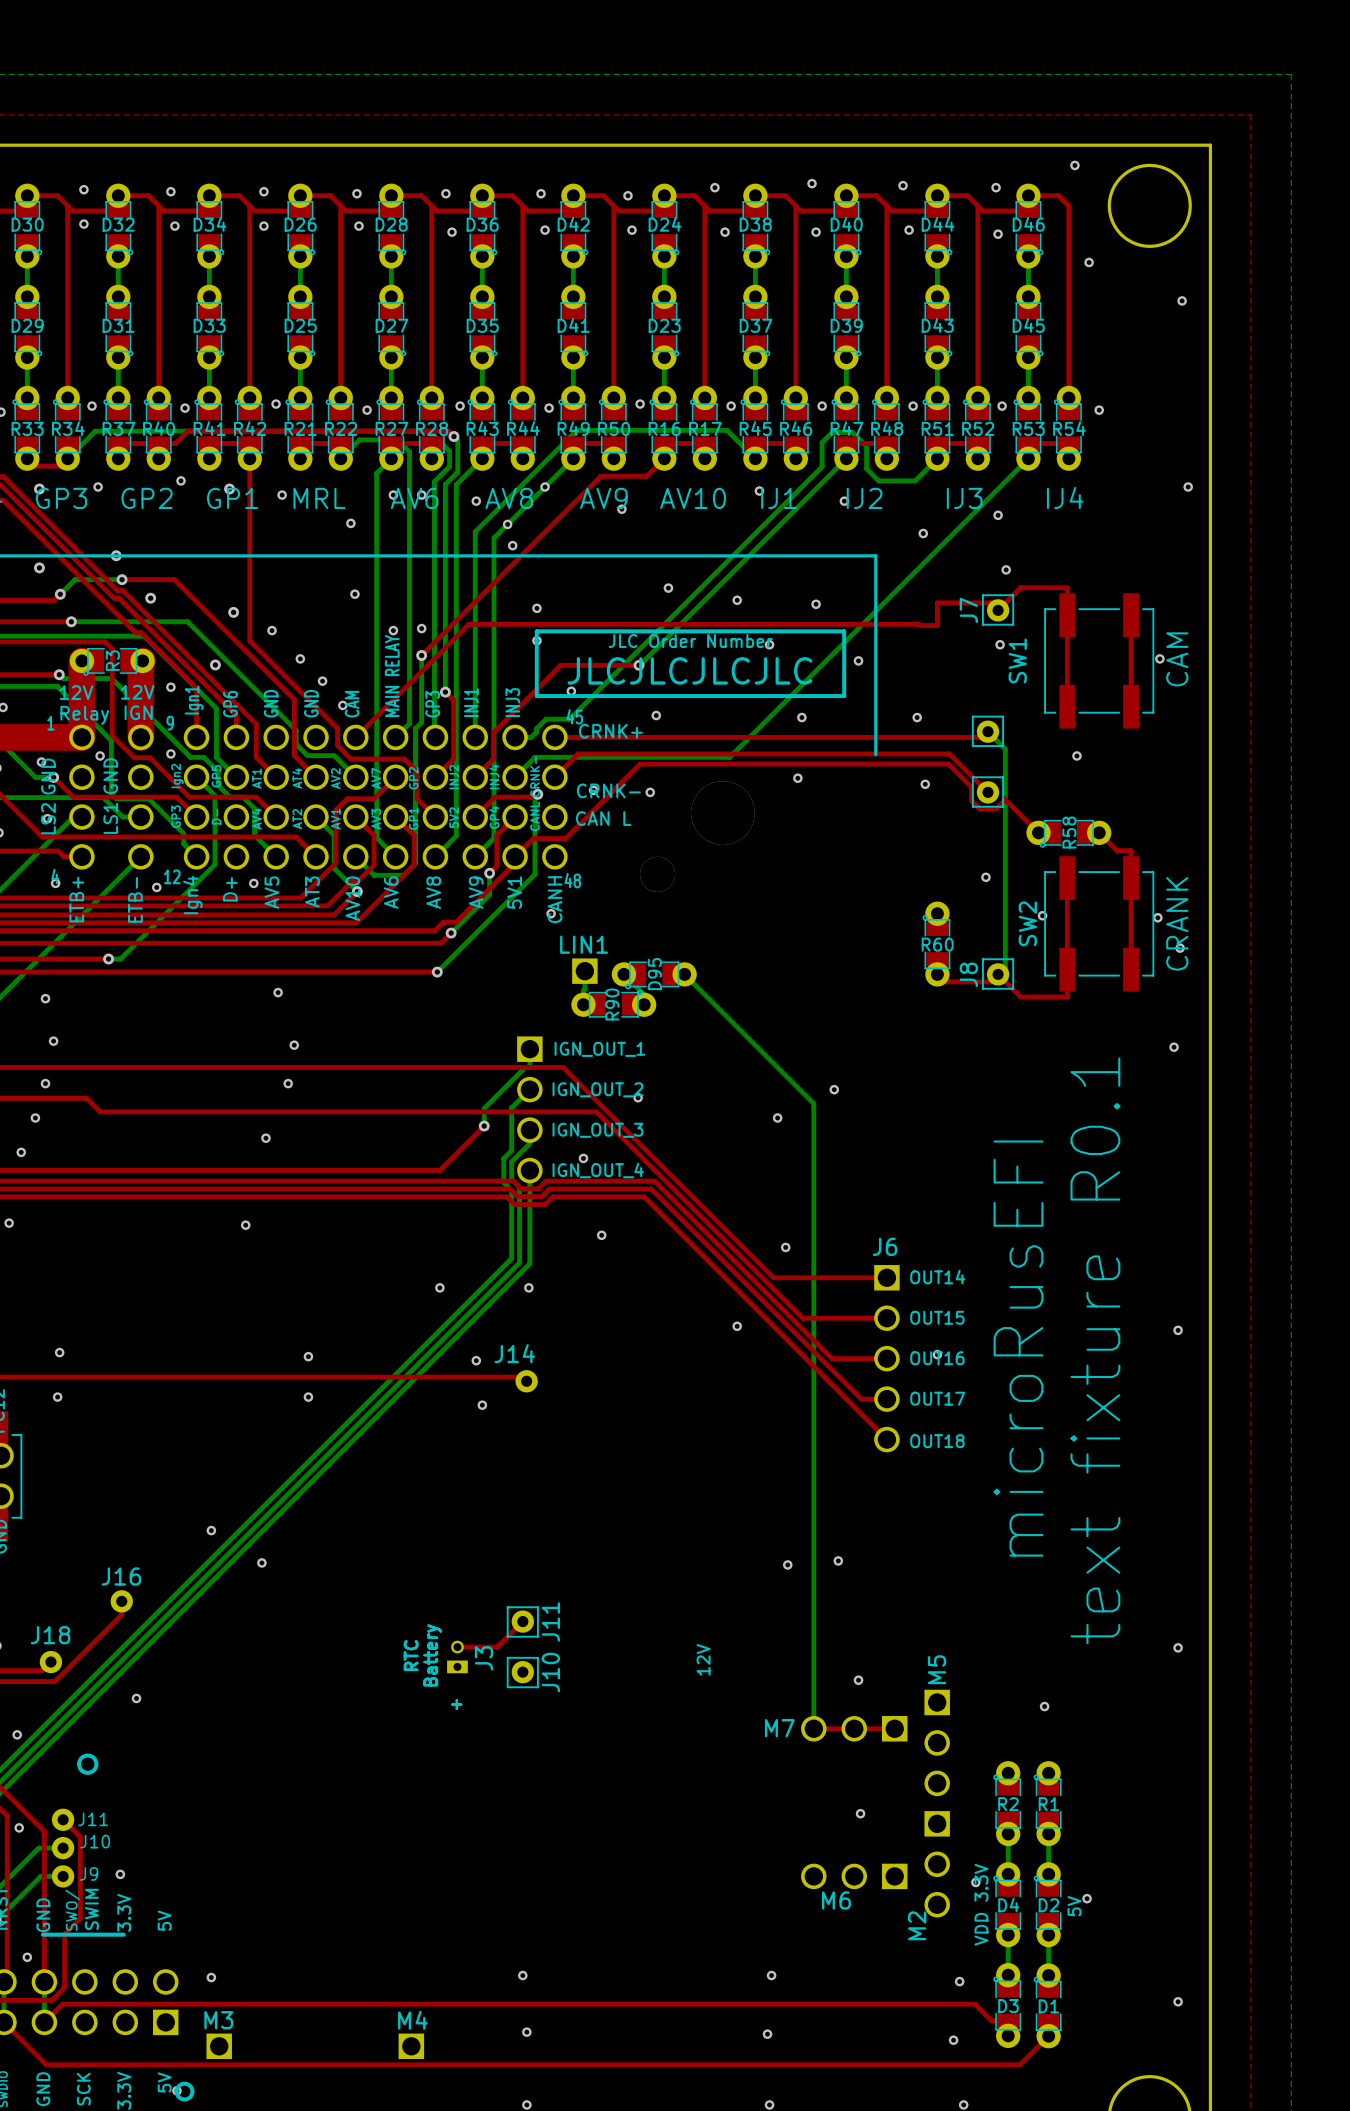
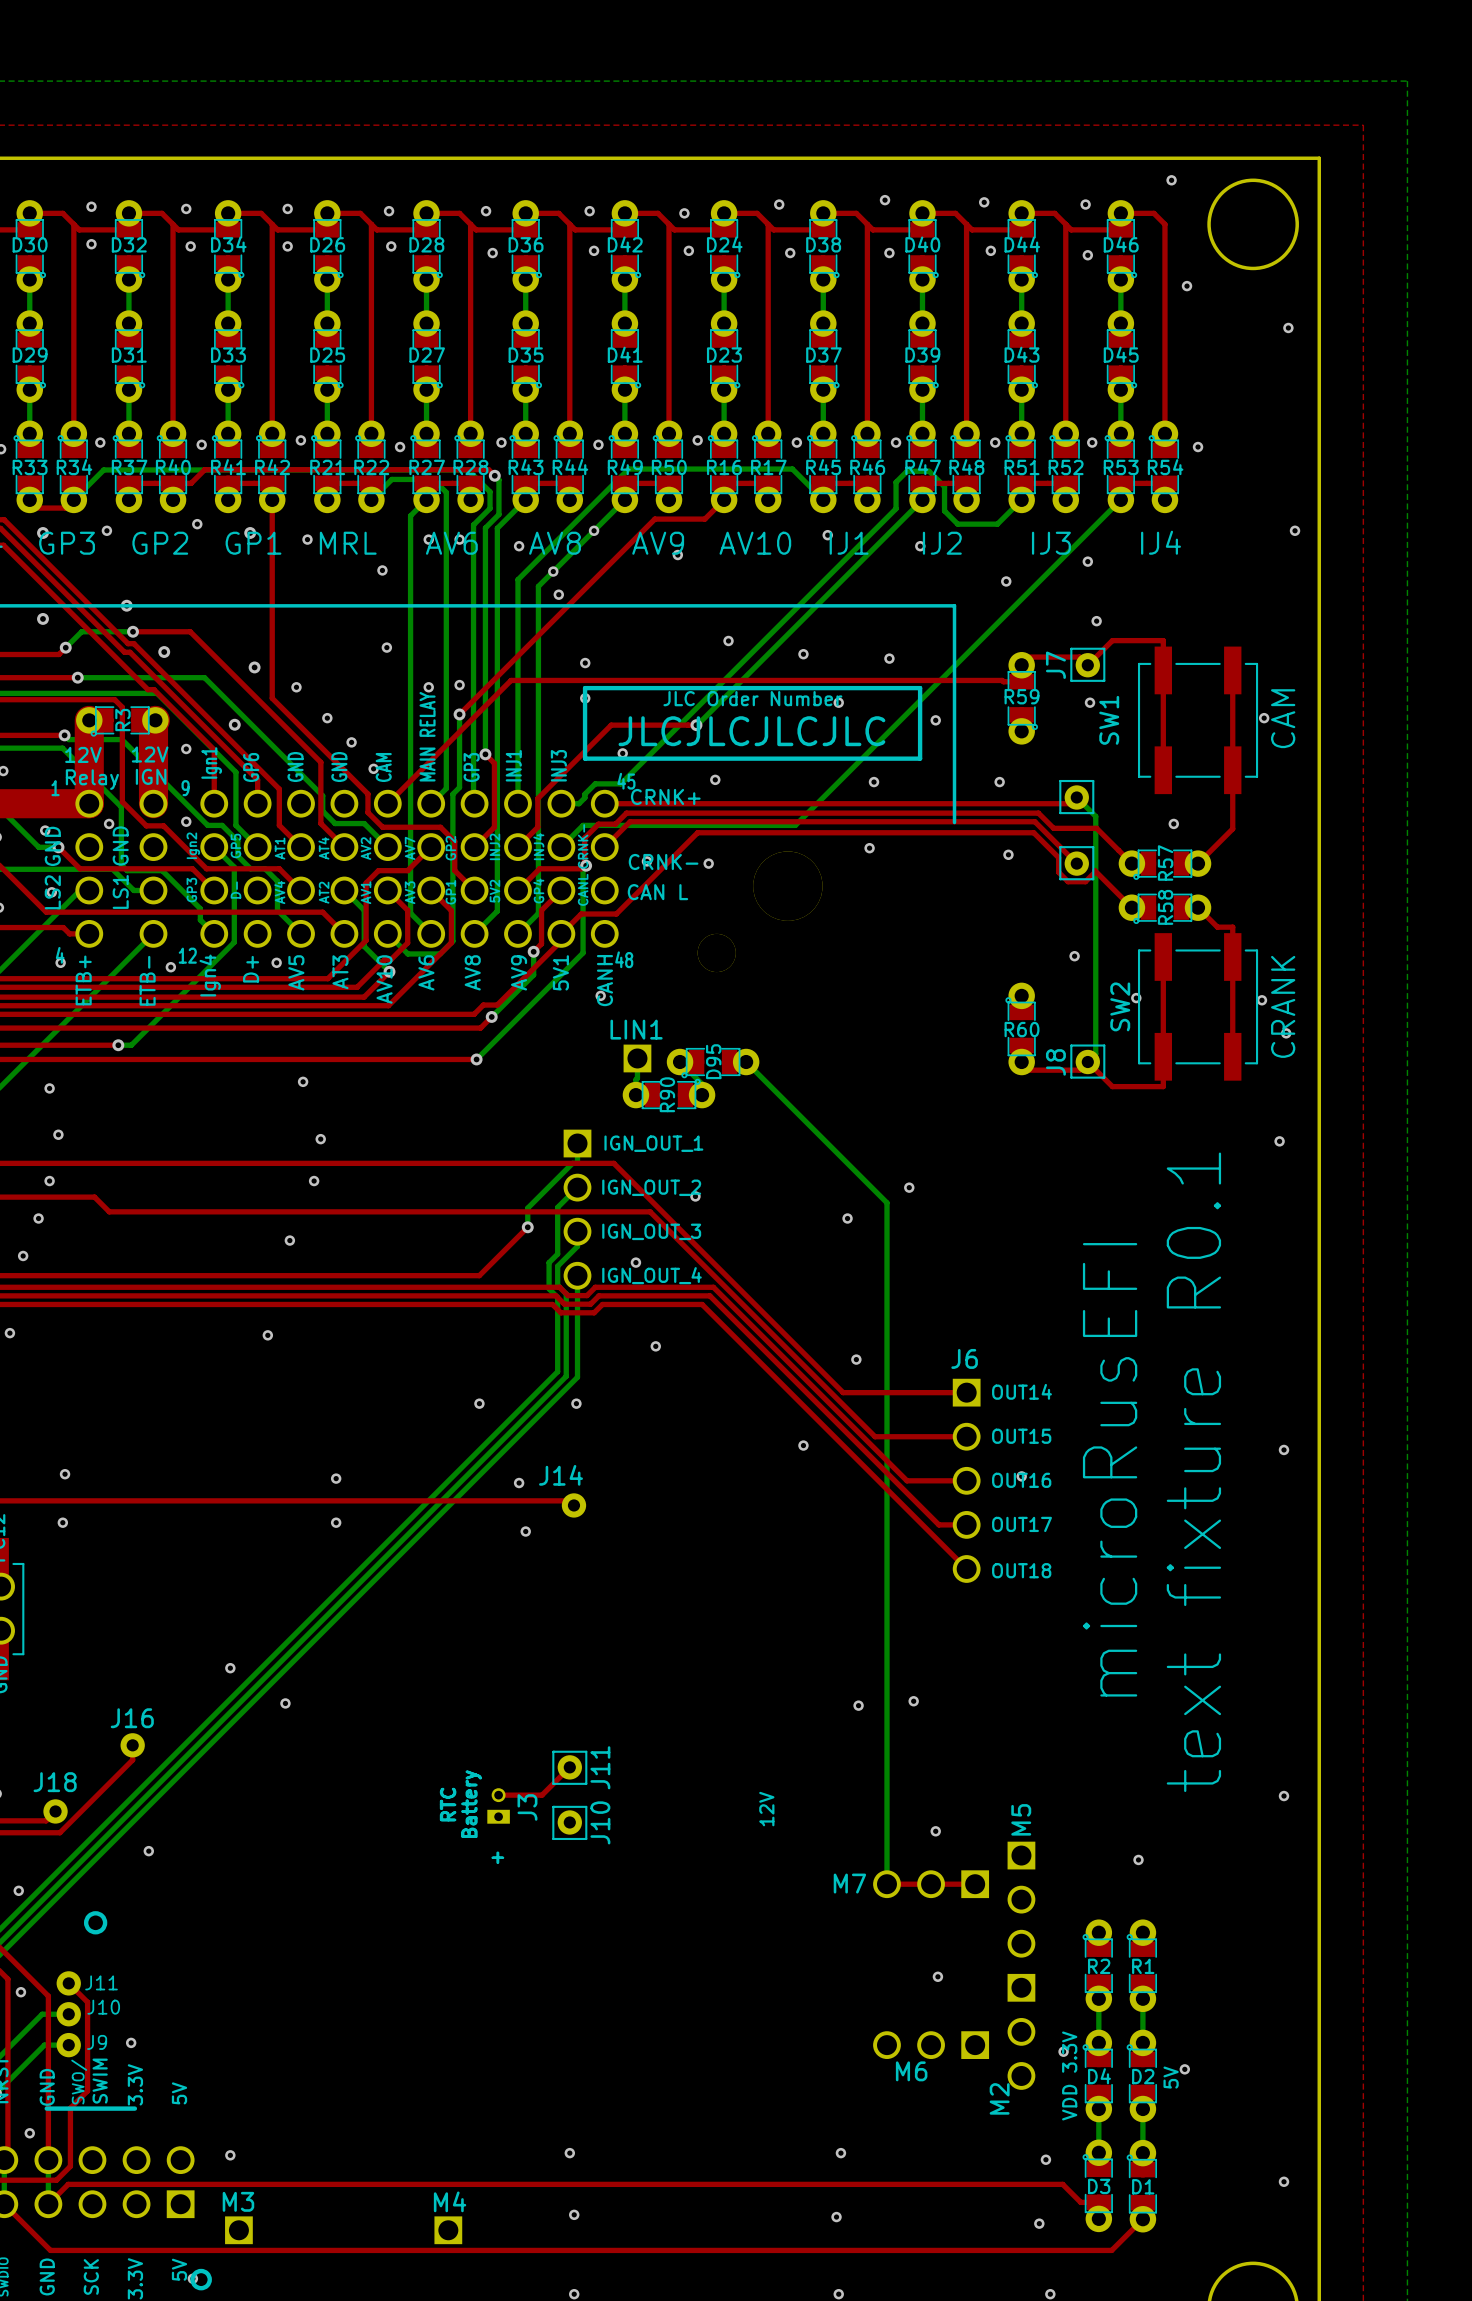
R59: none -> (1022, 698)
top track: none -> (1232, 770) (1232, 828) (1198, 863) (1181, 863)
top track: none -> (1148, 863) (1131, 863) (1096, 828) (1053, 828) (1038, 813) (626, 813) (615, 824) (598, 824) (584, 838) (584, 865)
R57: none -> (1164, 864)

